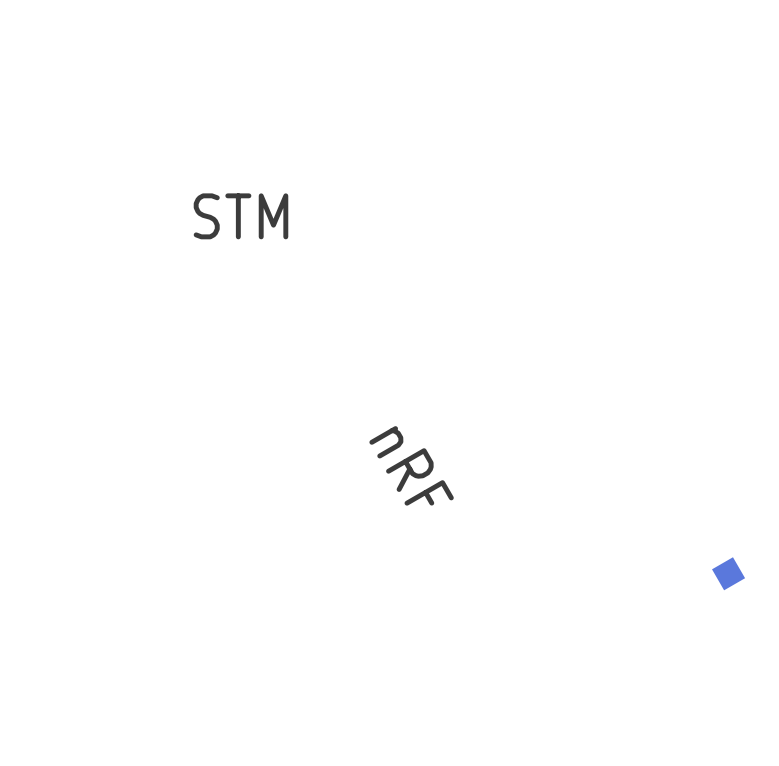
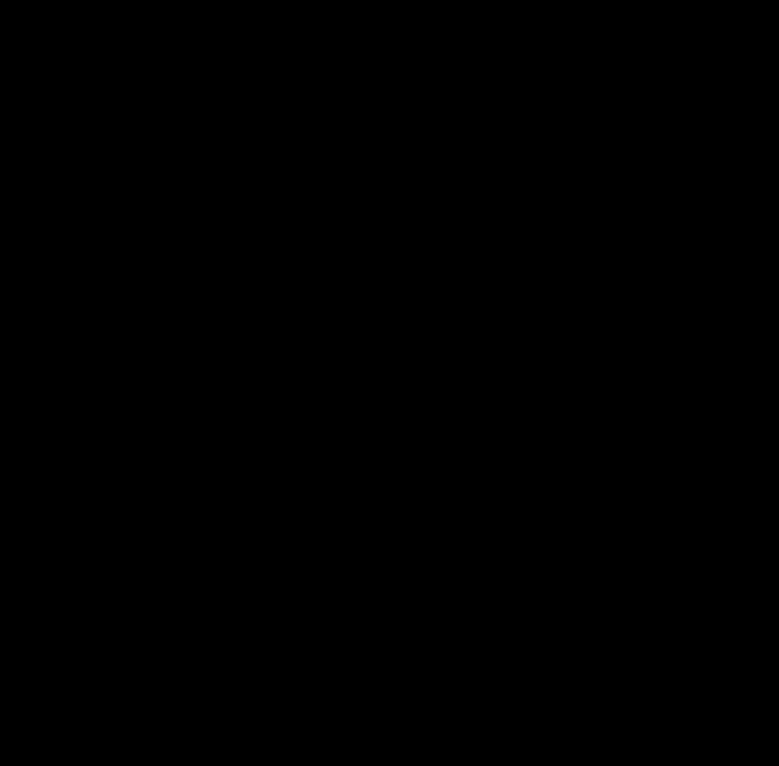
text: STM (240, 216) -> none
text: nRF (411, 465) -> none
part: (728, 573) -> none

